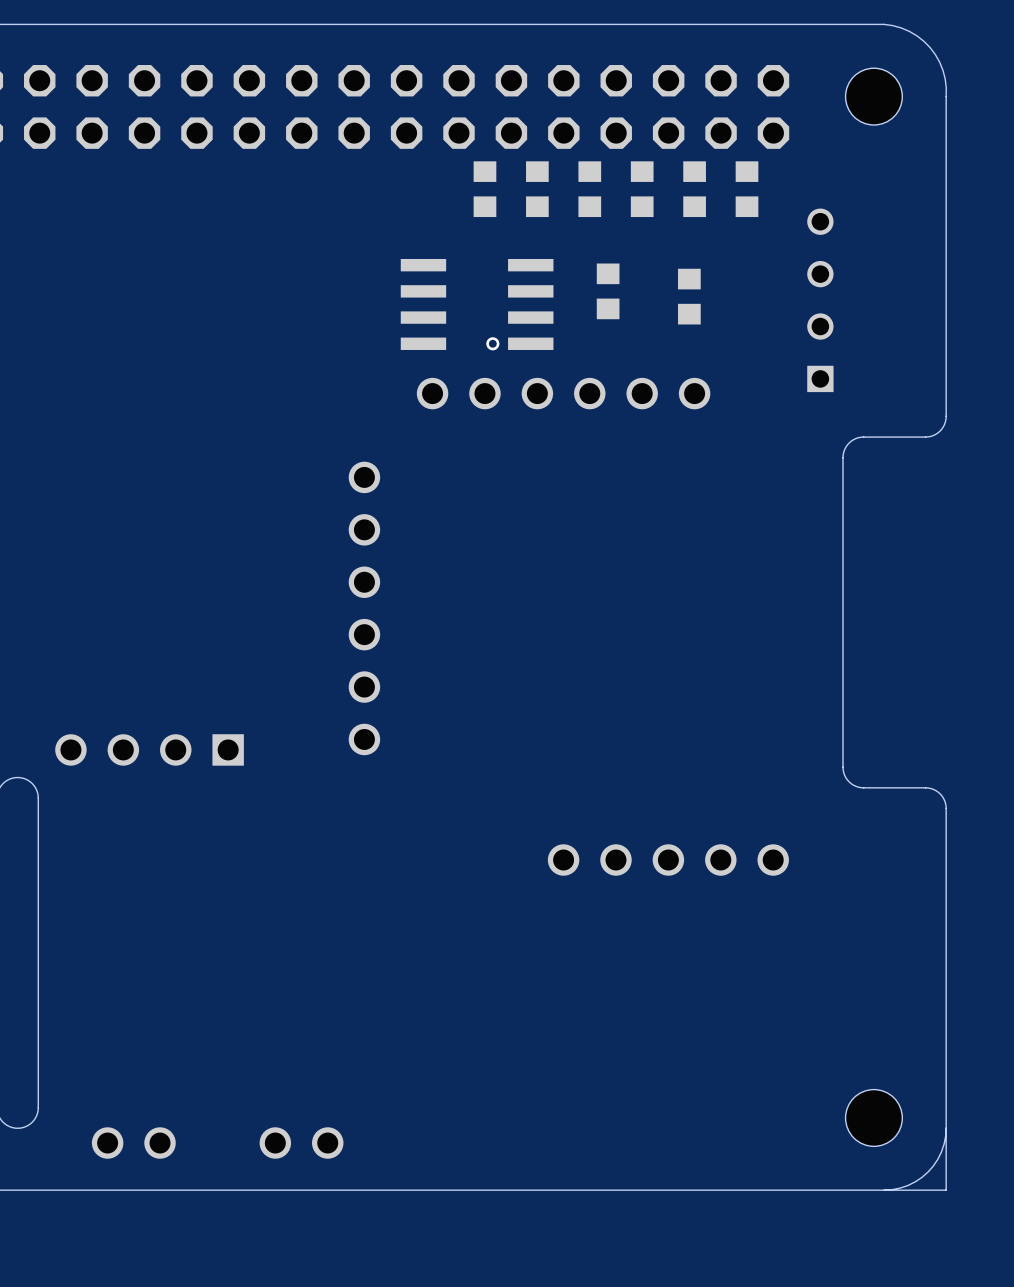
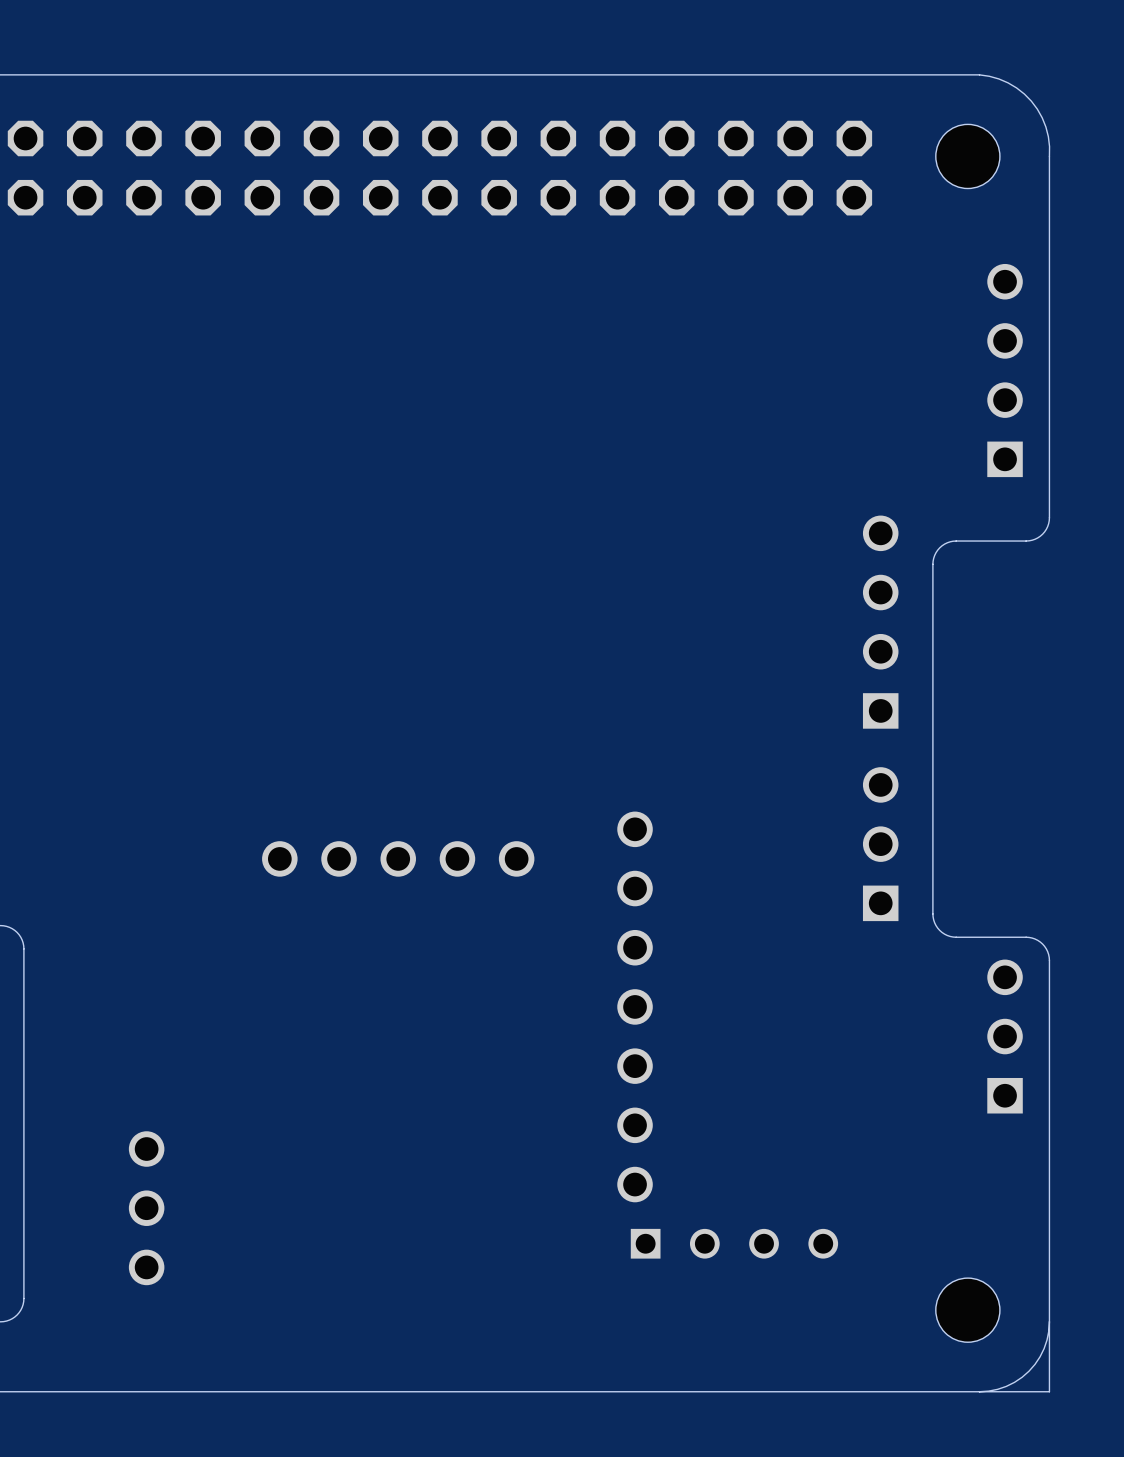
part: (484, 189) -> none
part: (537, 189) -> none
part: (589, 189) -> none
part: (642, 189) -> none
part: (694, 189) -> none
part: (747, 189) -> none
part: none -> (1005, 370)
part: (608, 291) -> none
part: (689, 296) -> none
part: (820, 300) -> none
part: (477, 304) -> none
part: (563, 393) -> none
part: none -> (880, 622)
part: (364, 608) -> none
part: none -> (880, 844)
part: (149, 749) -> none
part: none -> (635, 1006)
part position: (668, 860) -> (398, 858)
part: none -> (1005, 1036)
part: none -> (146, 1208)
part: none -> (734, 1243)
part: (133, 1143) -> none
part: (301, 1143) -> none

